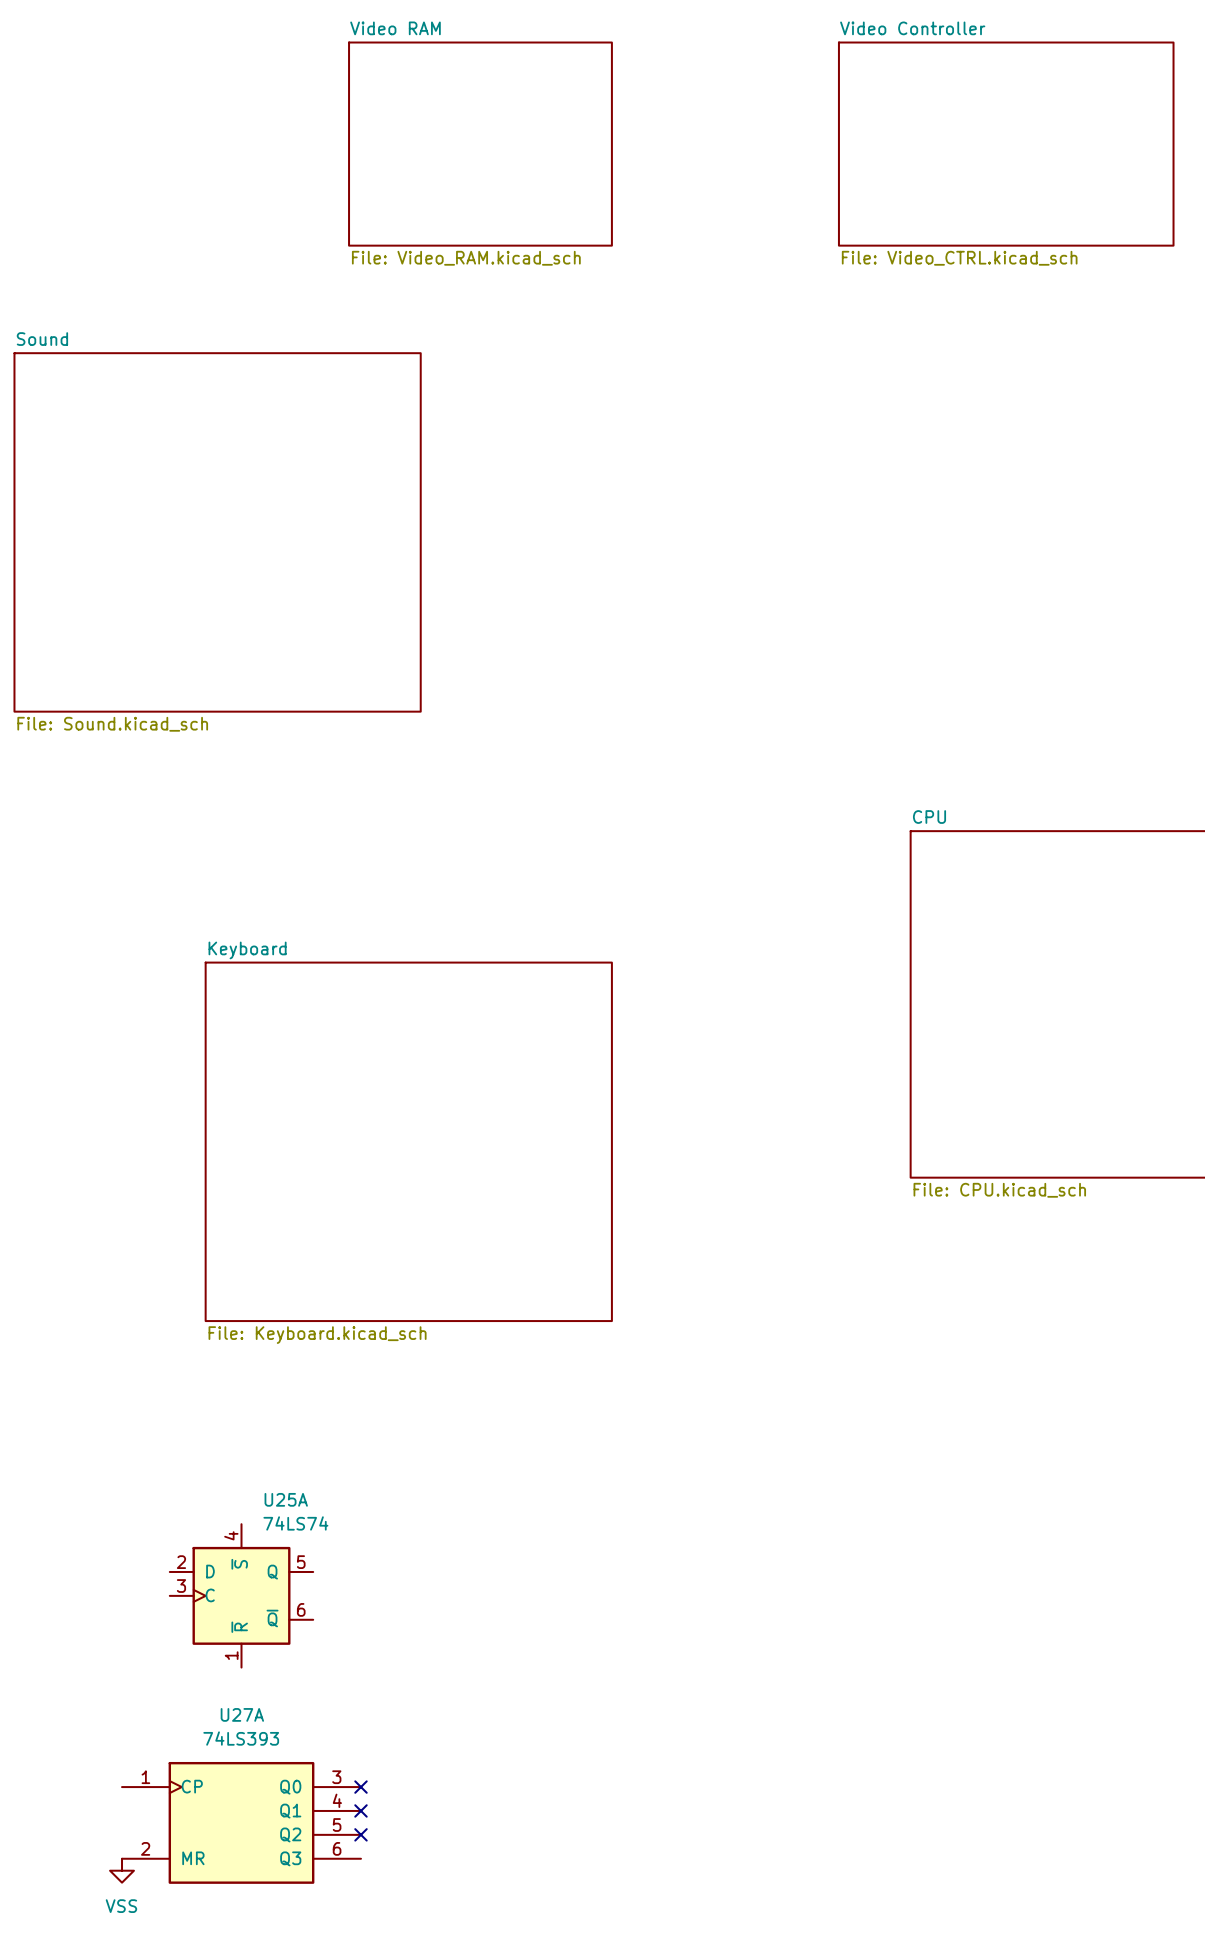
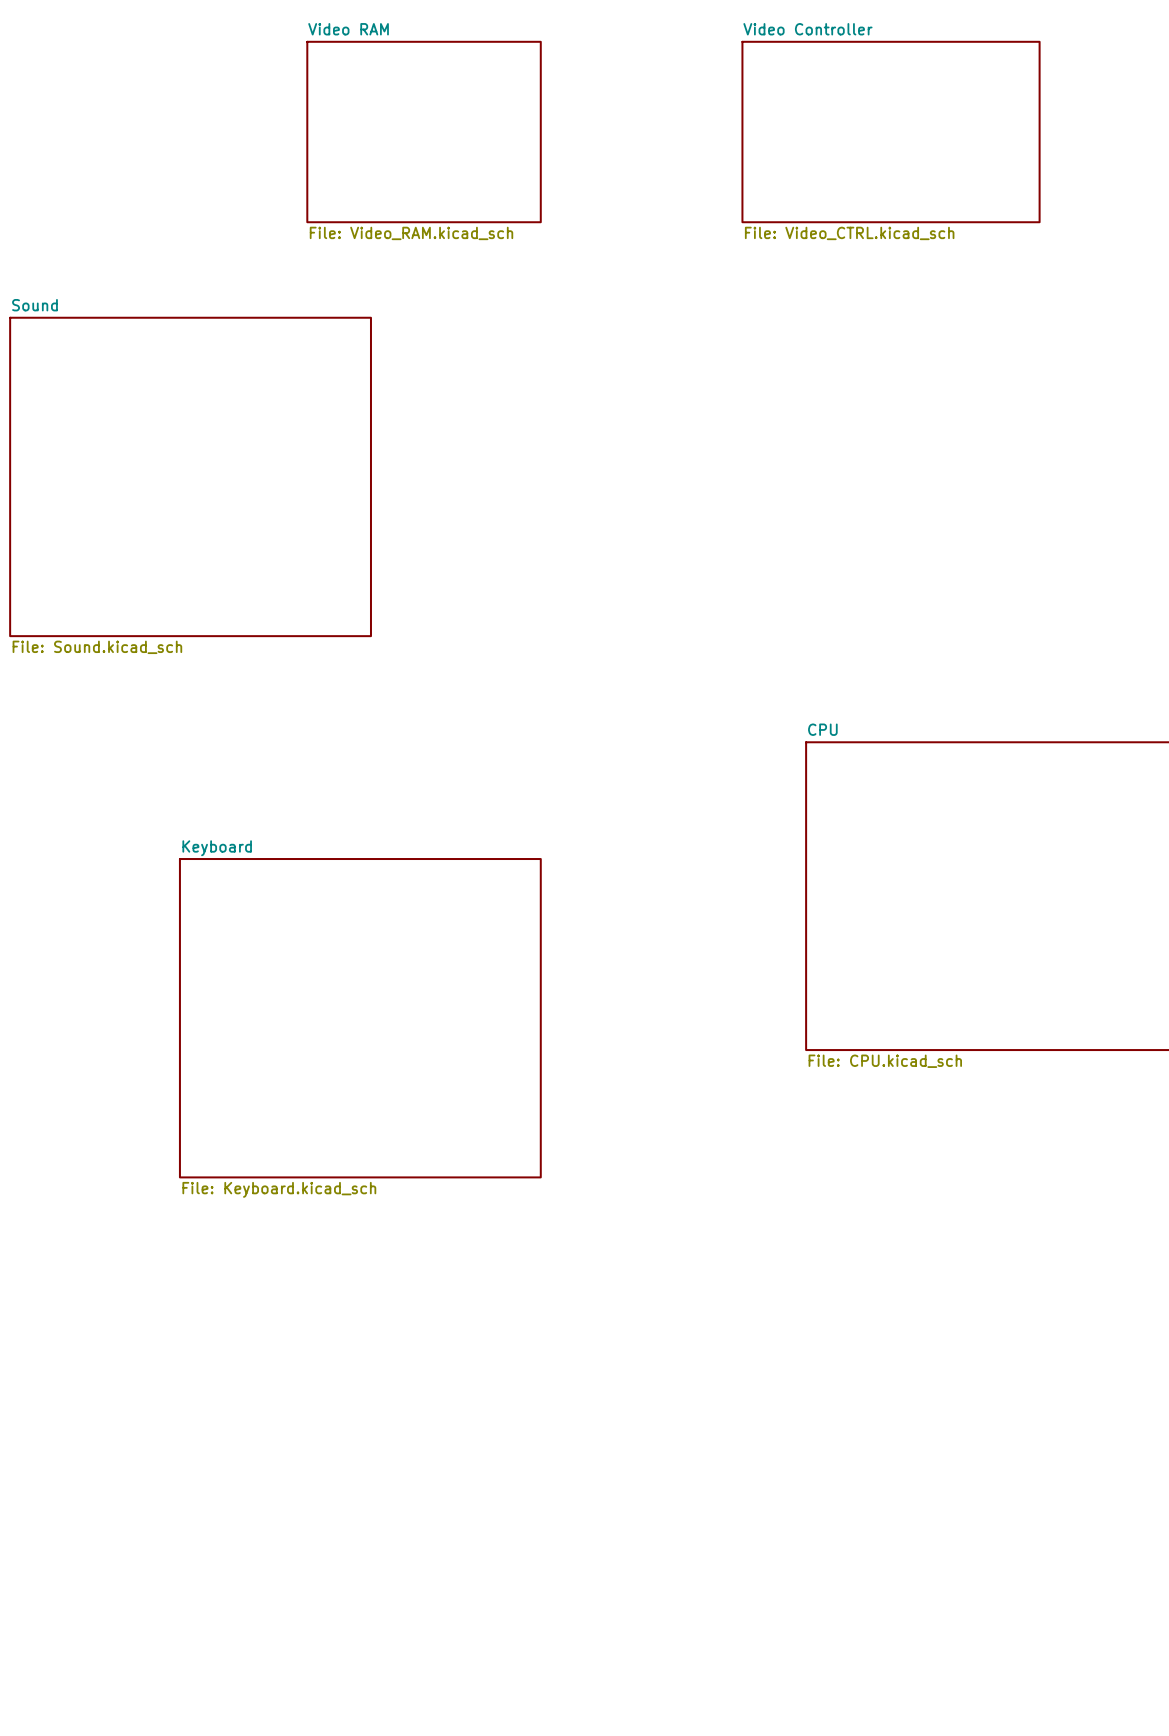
U25A: 74LS74 (241, 1595) -> none
no-connect mark: (360, 1787) -> none
no-connect mark: (360, 1810) -> none
U27A: 74LS393 (241, 1822) -> none
no-connect mark: (360, 1834) -> none
power symbol: VSS (122, 1870) -> none

